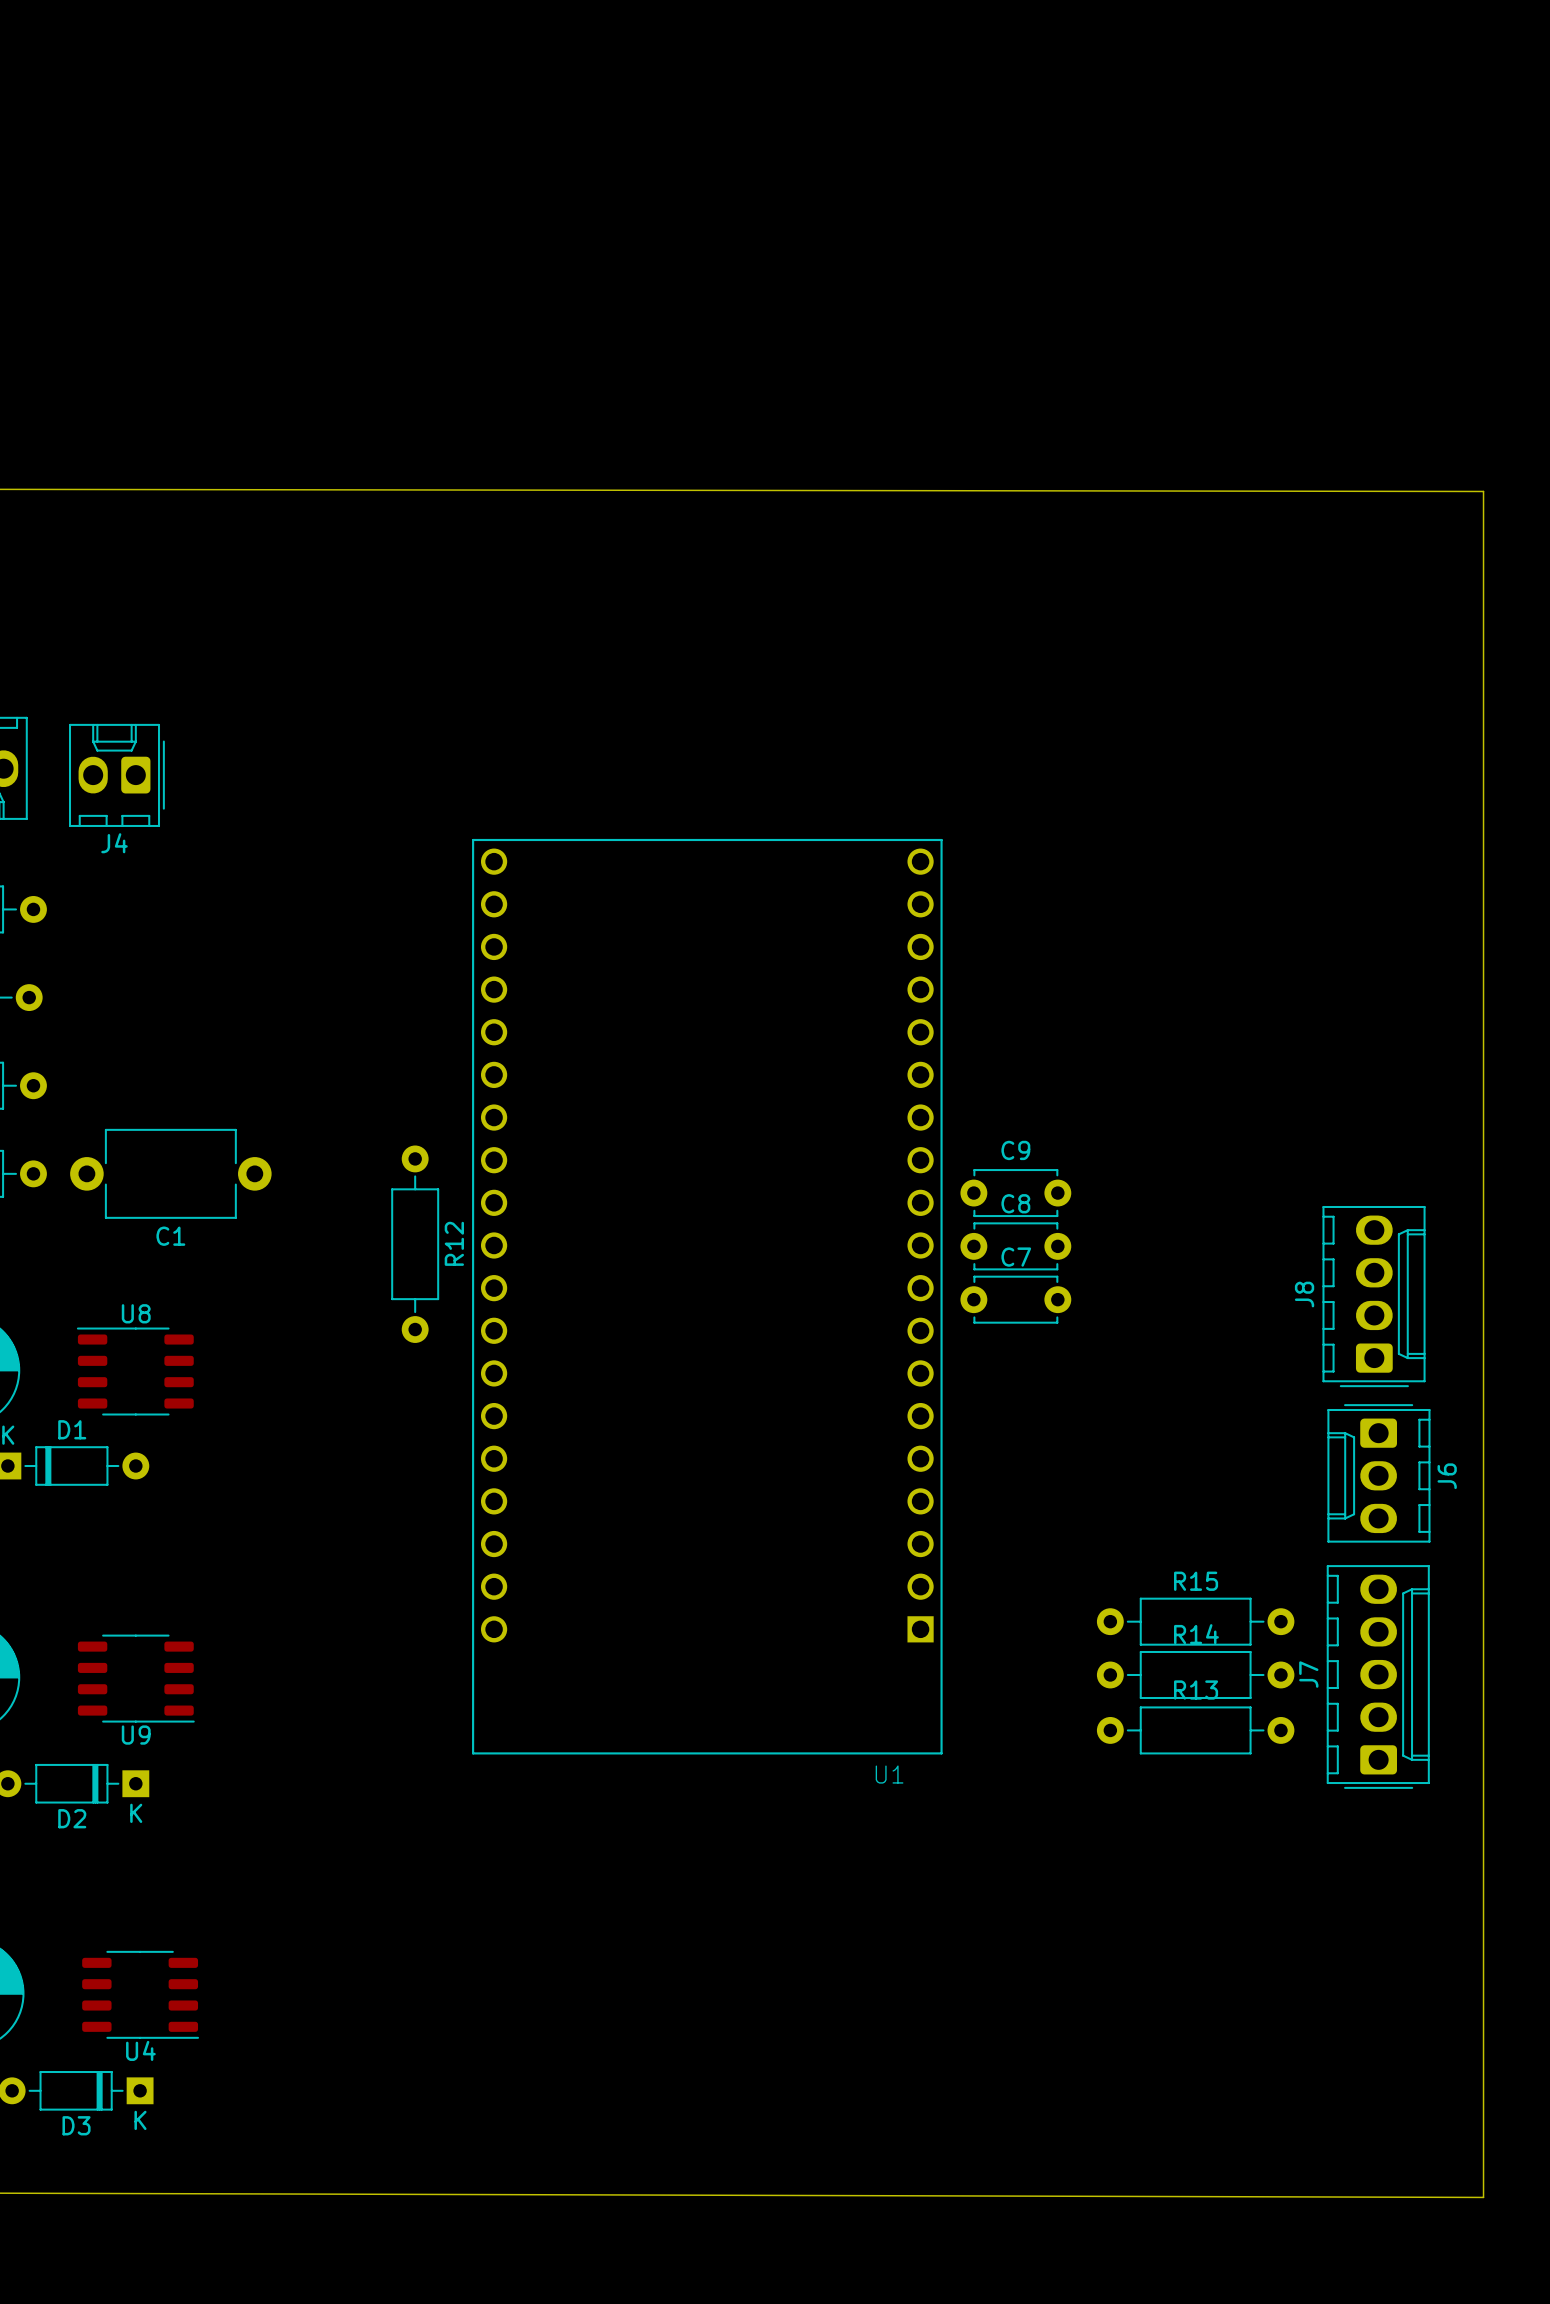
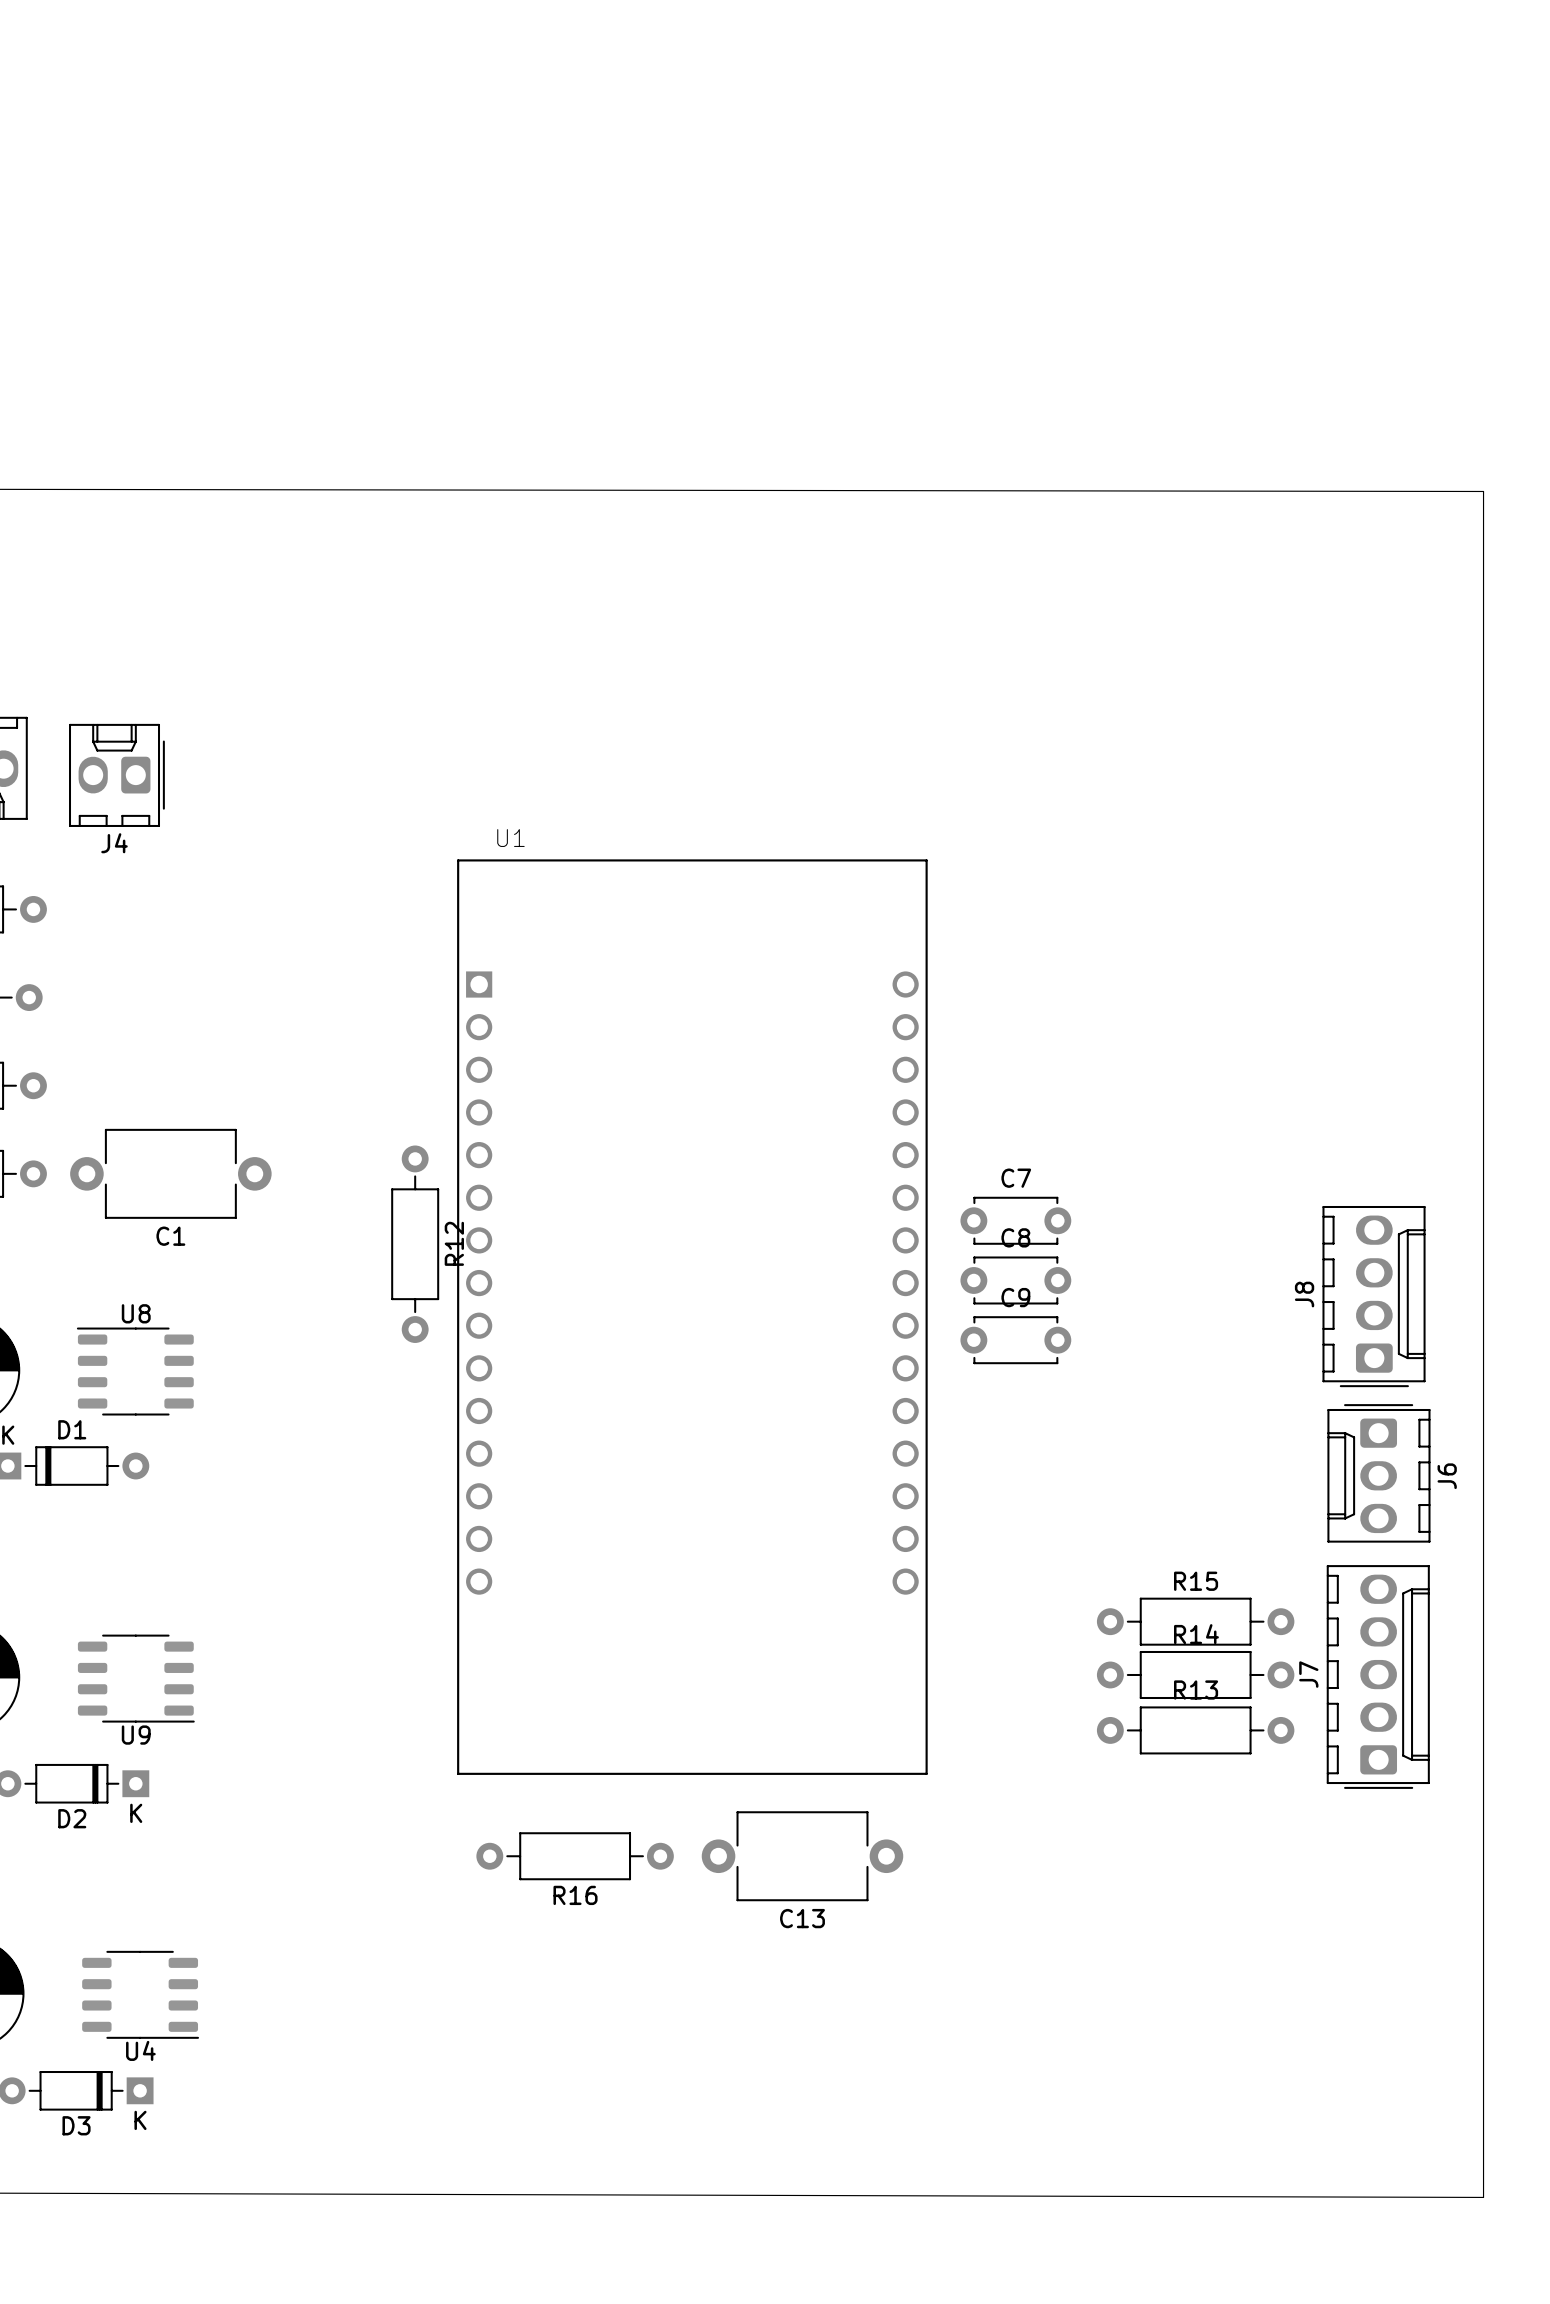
U1 footprint: [472, 838, 943, 1755] -> [457, 859, 928, 1775]
C9 position: (1015, 1193) -> (1015, 1340)
C8 position: (1015, 1246) -> (1015, 1280)
C7 position: (1015, 1299) -> (1015, 1220)
U1 name position: U1 (889, 1774) -> U1 (510, 838)
R16: none -> (575, 1856)
C13: none -> (802, 1856)

